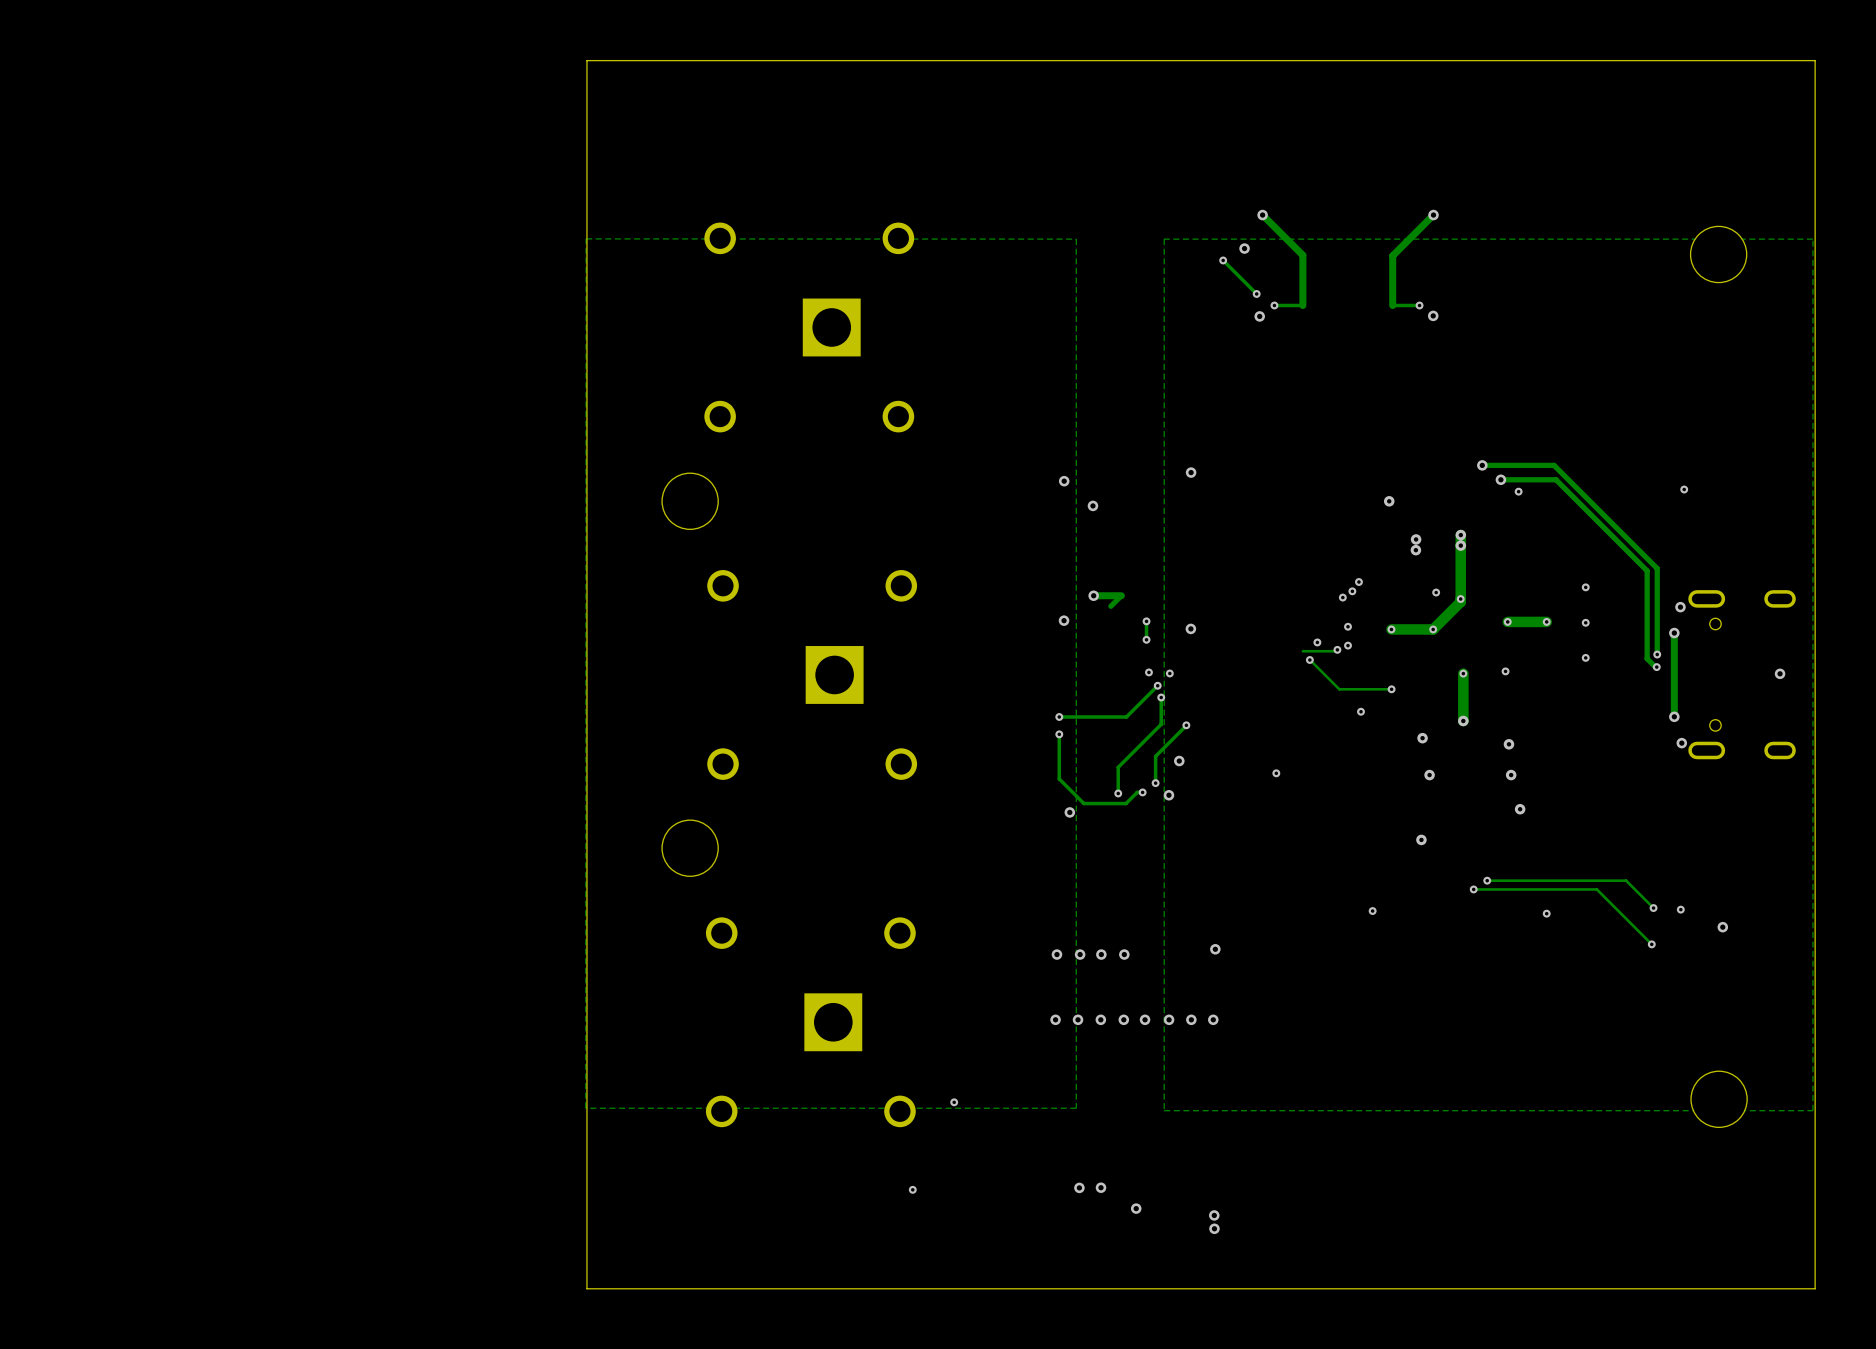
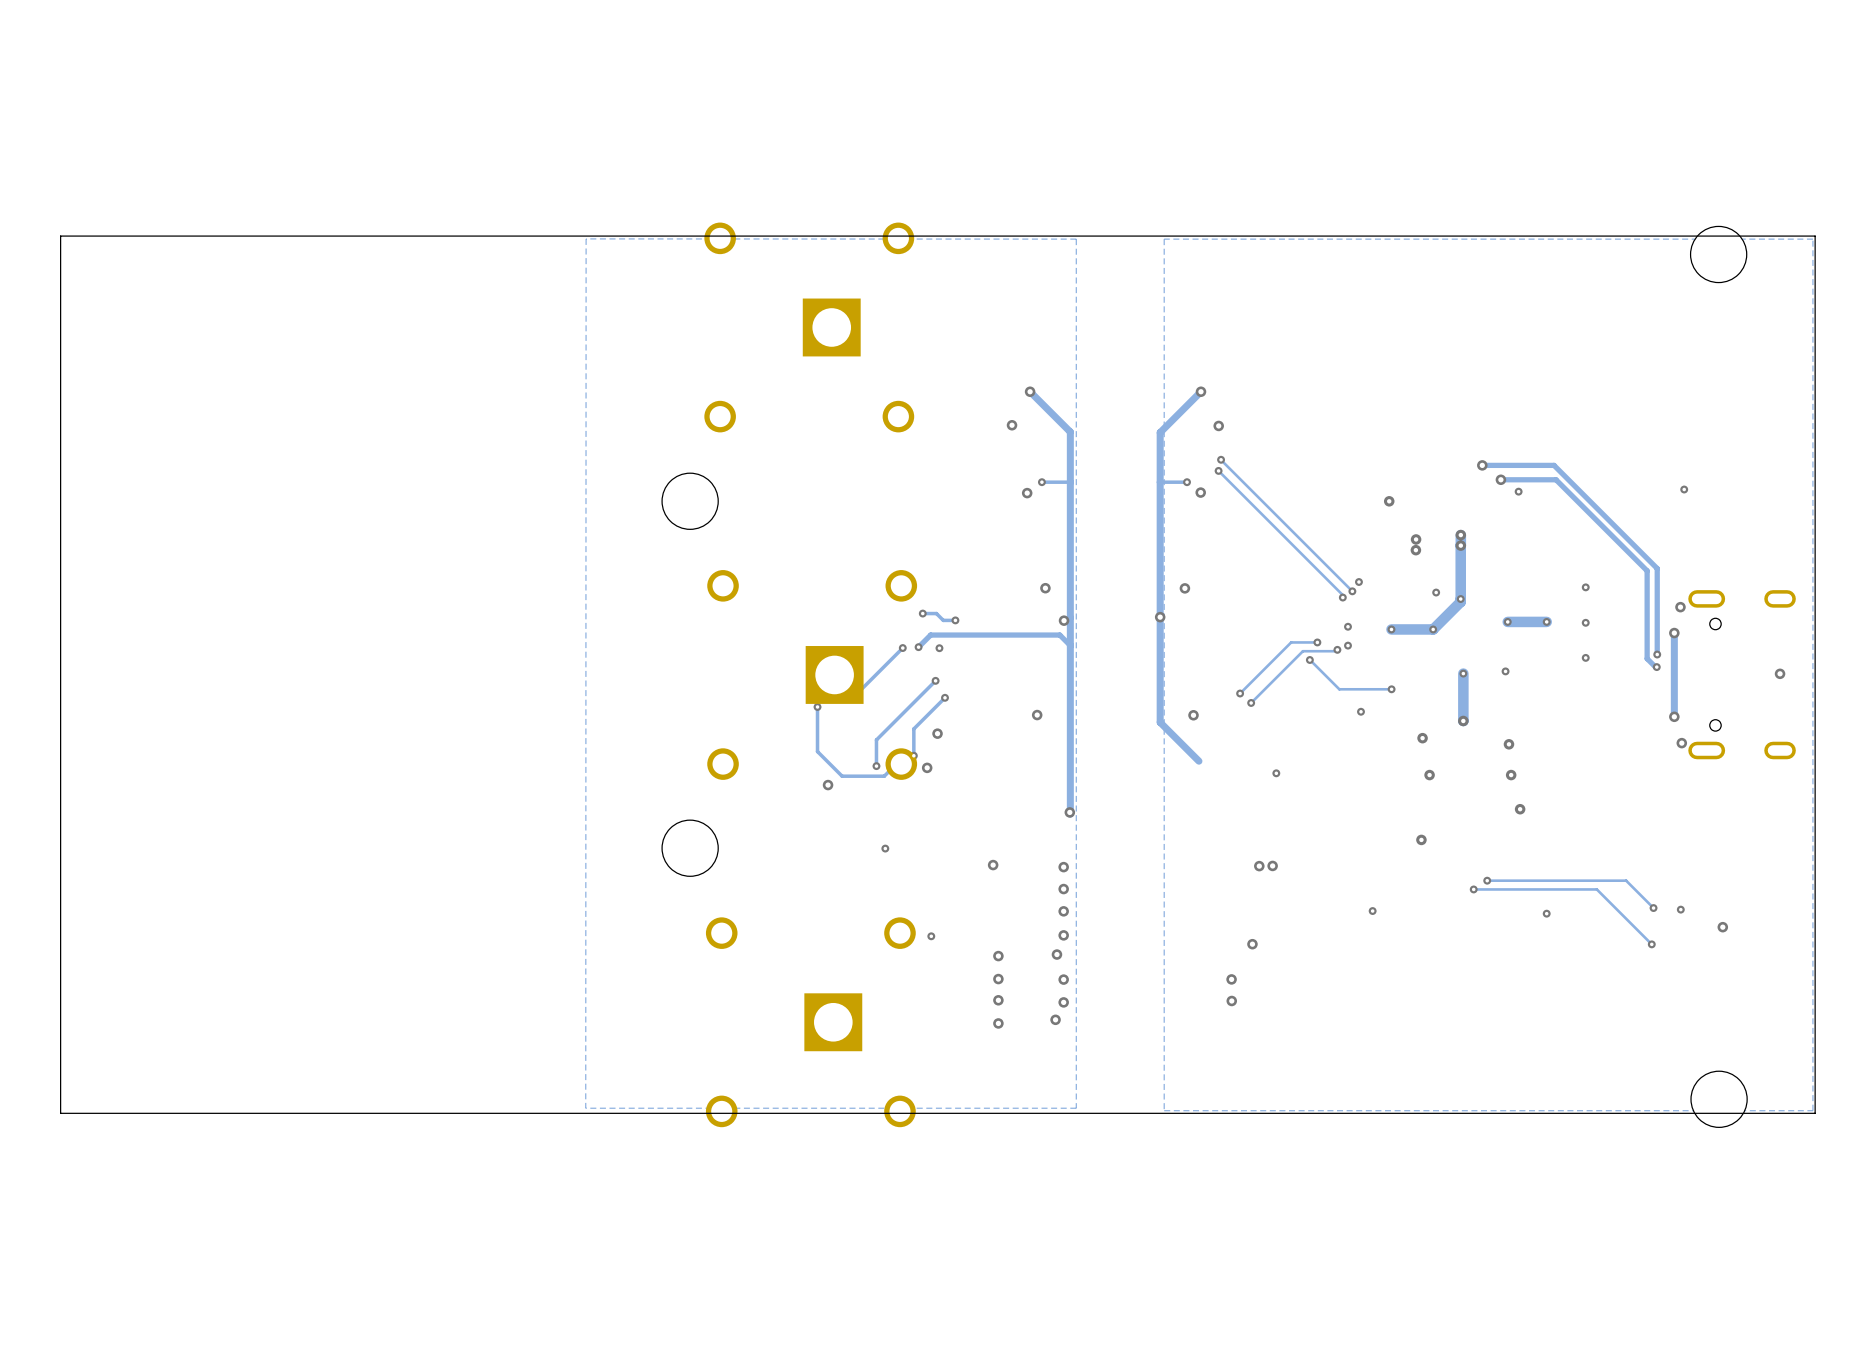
track: (1262, 215) (1302, 255) (1302, 305) (1274, 305) -> none
via: (1262, 215) -> none
track: (1433, 215) (1392, 255) (1392, 305) -> none
via: (1433, 215) -> none
board edge: (1815, 236) (1815, 60) (586, 60) (586, 1288) (1815, 1288) (1815, 1113) -> (1815, 236) (60, 236) (60, 1113) (1815, 1113)
via: (1244, 248) -> none
track: (1223, 260) (1256, 293) -> none
via: (1223, 260) -> none
via: (1256, 293) -> none
via: (1274, 305) -> none
track: (1419, 305) (1392, 305) -> (1187, 482) (1160, 482)
via: (1419, 305) -> none
via: (1433, 315) -> none
via: (1259, 316) -> none
track: none -> (1030, 391) (1070, 431) (1070, 814)
via: none -> (1030, 391)
track: none -> (1200, 391) (1160, 432) (1160, 722) (1198, 761)
via: none -> (1200, 391)
via: none -> (1012, 425)
via: none -> (1218, 425)
via: none -> (1221, 459)
track: none -> (1221, 460) (1352, 591)
track: none -> (1218, 470) (1342, 595)
via: none -> (1218, 470)
via position: (1191, 472) -> (1200, 492)
via: (1064, 481) -> none
via: none -> (1041, 482)
track: none -> (1070, 482) (1041, 482)
via: none -> (1187, 482)
via: none -> (1027, 493)
via: (1092, 505) -> none
via: none -> (1045, 588)
via: none -> (1184, 588)
track: (1093, 595) (1121, 595) (1110, 606) -> none
via: (1093, 595) -> none
track: none -> (922, 613) (936, 613) (943, 620) (955, 620)
via: none -> (922, 613)
via: none -> (1160, 617)
via: none -> (955, 620)
track: (1146, 621) (1146, 639) -> none
via: (1146, 621) -> none
via: (1190, 628) -> none
via: (1146, 639) -> none
track: none -> (1317, 642) (1291, 642) (1238, 693)
track: none -> (1070, 645) (1059, 635) (930, 635) (918, 647)
via: none -> (918, 647)
track: none -> (902, 648) (861, 689) (817, 689)
via: none -> (902, 648)
via: none -> (939, 648)
track: none -> (1302, 651) (1251, 702)
via: (1148, 672) -> none
via: (1169, 673) -> none
track: none -> (935, 680) (876, 739) (876, 766)
via: none -> (935, 680)
track: (1157, 685) (1126, 716) (1059, 716) -> none
via: (1157, 685) -> none
via: none -> (1240, 693)
track: none -> (944, 697) (913, 728) (913, 755)
via: none -> (944, 697)
track: (1161, 697) (1161, 724) (1118, 767) (1118, 793) -> none
via: (1161, 697) -> none
via: none -> (1251, 702)
via: none -> (817, 706)
via: none -> (1037, 715)
via: none -> (1193, 715)
via: (1059, 716) -> none
track: (1186, 725) (1155, 756) (1155, 783) -> none
via: (1186, 725) -> none
via: none -> (937, 733)
track: (1059, 734) (1059, 778) (1083, 803) (1126, 803) (1137, 792) (1142, 792) -> (817, 706) (817, 751) (842, 776) (884, 776) (895, 765) (900, 765)
via: (1059, 734) -> none
via: none -> (913, 755)
via: (1179, 761) -> none
via: none -> (876, 766)
via: none -> (927, 767)
via: (1155, 783) -> none
via: none -> (828, 785)
via: (1142, 792) -> none
via: (1118, 793) -> none
via: (1168, 795) -> none
via: none -> (885, 848)
via: none -> (993, 865)
via: none -> (1272, 865)
via: none -> (1259, 866)
via: none -> (1063, 867)
via: none -> (1063, 889)
via: none -> (1063, 911)
via: none -> (1063, 935)
via: none -> (931, 936)
via: none -> (1252, 944)
via: (1215, 949) -> none
via: (1080, 954) -> none
via: (1101, 954) -> none
via: (1124, 954) -> none
via: none -> (998, 956)
via: none -> (998, 979)
via: none -> (1063, 979)
via: none -> (1231, 979)
via: none -> (998, 1000)
via: none -> (1231, 1000)
via: none -> (1063, 1002)
via: (1078, 1019) -> none
via: (1100, 1019) -> none
via: (1123, 1019) -> none
via: (1145, 1019) -> none
via: (1169, 1019) -> none
via: (1191, 1019) -> none
via: (1213, 1019) -> none
via: none -> (998, 1023)
via: (954, 1102) -> none
via: (1079, 1187) -> none
via: (1101, 1187) -> none
via: (912, 1189) -> none
via: (1136, 1208) -> none
via: (1214, 1215) -> none
via: (1214, 1228) -> none

